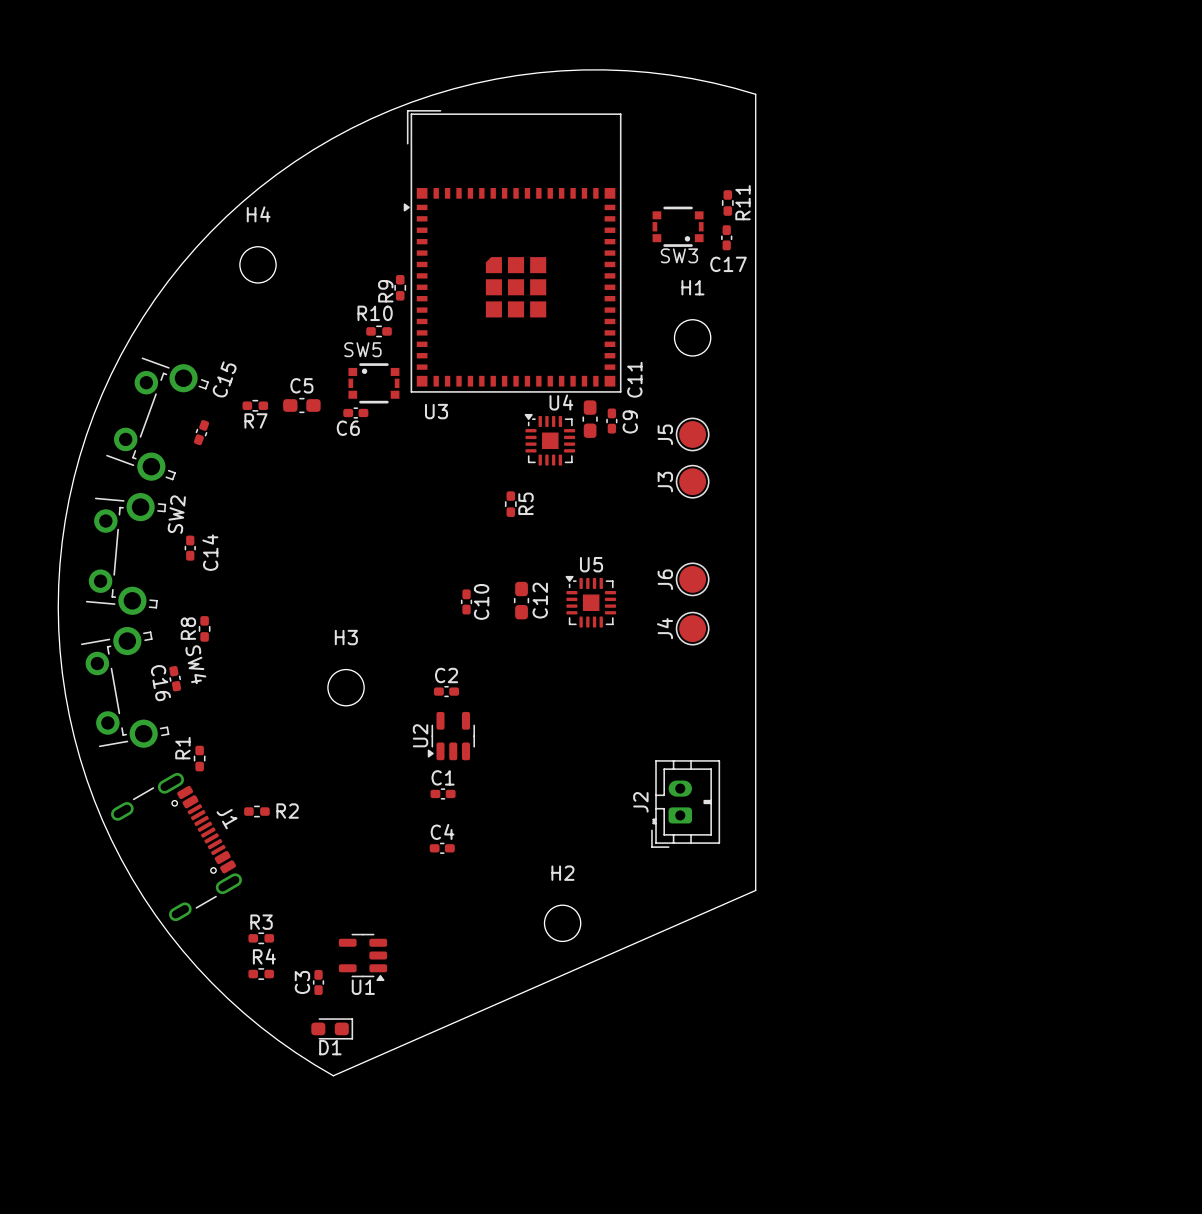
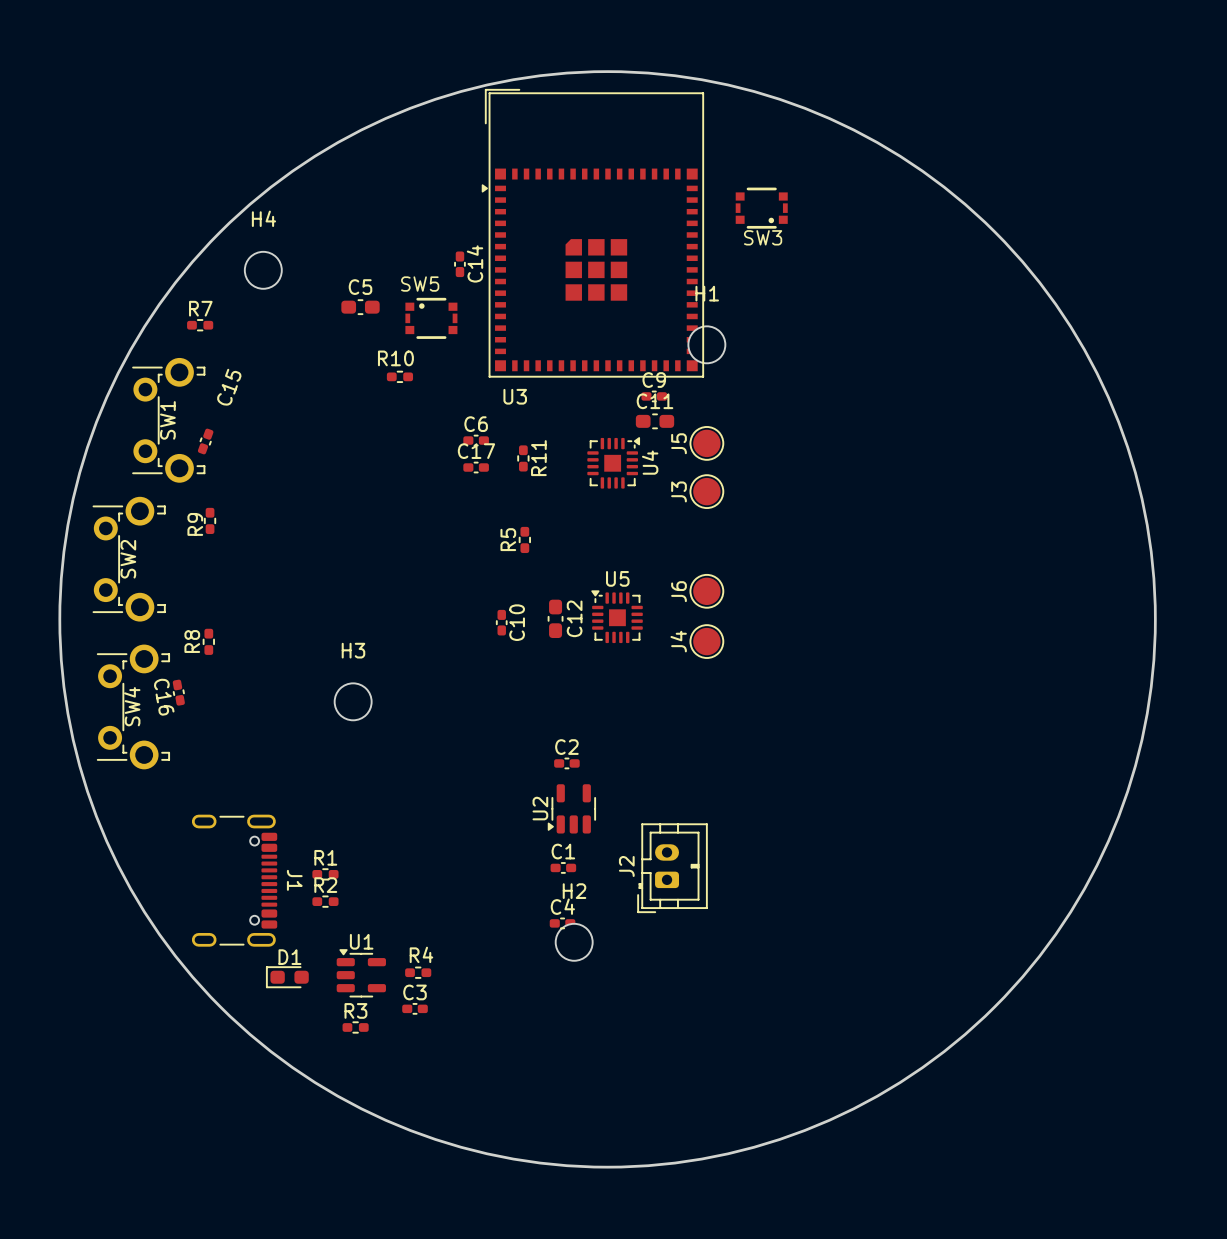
round board edge: none -> [58, 70, 1157, 1169]
board edge: (755, 94) (755, 890) (333, 1075) (296, 1052) (260, 1027) (211, 983) (182, 950) (156, 915) (132, 879) (111, 840) (86, 779) (74, 737) (65, 694) (58, 629) (58, 585) (62, 542) (69, 498) (79, 456) (102, 394) (120, 355) (155, 299) (181, 264) (210, 231) (259, 187) (294, 161) (332, 138) (371, 118) (432, 95) (474, 83) (517, 75) (561, 70) (626, 70) (670, 75) (713, 82) (755, 94) -> none
R11 position: (727, 203) -> (523, 458)
SW3 position: (678, 226) -> (761, 208)
C17 rotation: 0° (726, 237) -> 90° clockwise (476, 467)
C17 position: (726, 237) -> (476, 467)
U3 position: (512, 251) -> (592, 233)
C17 name position: C17 (728, 264) -> C17 (476, 451)
R9 position: (400, 287) -> (210, 520)
R10 position: (379, 331) -> (399, 376)
C11 name position: C11 (634, 379) -> C11 (655, 401)
SW5 position: (373, 383) -> (431, 318)
R7 position: (255, 405) -> (200, 325)
C5 position: (301, 405) -> (360, 307)
SW1: none -> (168, 420)
C6 position: (355, 413) -> (476, 440)
part: (157, 419) -> none
C11 rotation: 0° (590, 419) -> 90° clockwise (655, 421)
C11 position: (590, 419) -> (655, 421)
R7 name position: R7 (255, 420) -> R7 (200, 308)
C9 rotation: 0° (611, 421) -> 90° clockwise (654, 396)
C9 position: (611, 421) -> (654, 396)
C6 name position: C6 (348, 428) -> C6 (476, 424)
U4 rotation: 0° (549, 439) -> 90° clockwise (613, 462)
U4 position: (549, 439) -> (613, 462)
R5 name position: R5 (526, 503) -> R5 (508, 539)
R5 position: (510, 504) -> (524, 539)
SW2 name position: SW2 (176, 514) -> SW2 (128, 559)
C14 position: (190, 548) -> (459, 264)
C14 name position: C14 (210, 552) -> C14 (475, 263)
SW2 rotation: 0° (126, 553) -> 5° counterclockwise (129, 559)
C12 position: (521, 600) -> (555, 618)
C10 position: (466, 601) -> (501, 622)
U5 position: (590, 601) -> (617, 616)
SW4 name position: SW4 (195, 664) -> SW4 (132, 706)
SW4 rotation: 0° (125, 687) -> 10° clockwise (133, 706)
C2 position: (446, 691) -> (566, 763)
U2 position: (451, 736) -> (571, 808)
R1 rotation: 0° (199, 758) -> 90° clockwise (325, 874)
R1 position: (199, 758) -> (325, 874)
J1 footprint: [110, 772, 242, 922] -> [191, 814, 278, 947]
C1 position: (443, 793) -> (563, 867)
J2 position: (685, 804) -> (672, 868)
R2 position: (256, 811) -> (325, 901)
R2 name position: R2 (287, 811) -> R2 (325, 885)
J1 name position: J1 (227, 819) -> J1 (294, 880)
C4 position: (442, 848) -> (562, 923)
R3 position: (261, 938) -> (355, 1027)
U1 rotation: 0° (362, 957) -> 180° (361, 973)
R4 position: (261, 974) -> (418, 972)
C3 rotation: 0° (318, 982) -> 90° clockwise (415, 1008)
C3 position: (318, 982) -> (415, 1008)
D1 rotation: 0° (332, 1028) -> 180° (287, 977)
D1 position: (332, 1028) -> (287, 977)

